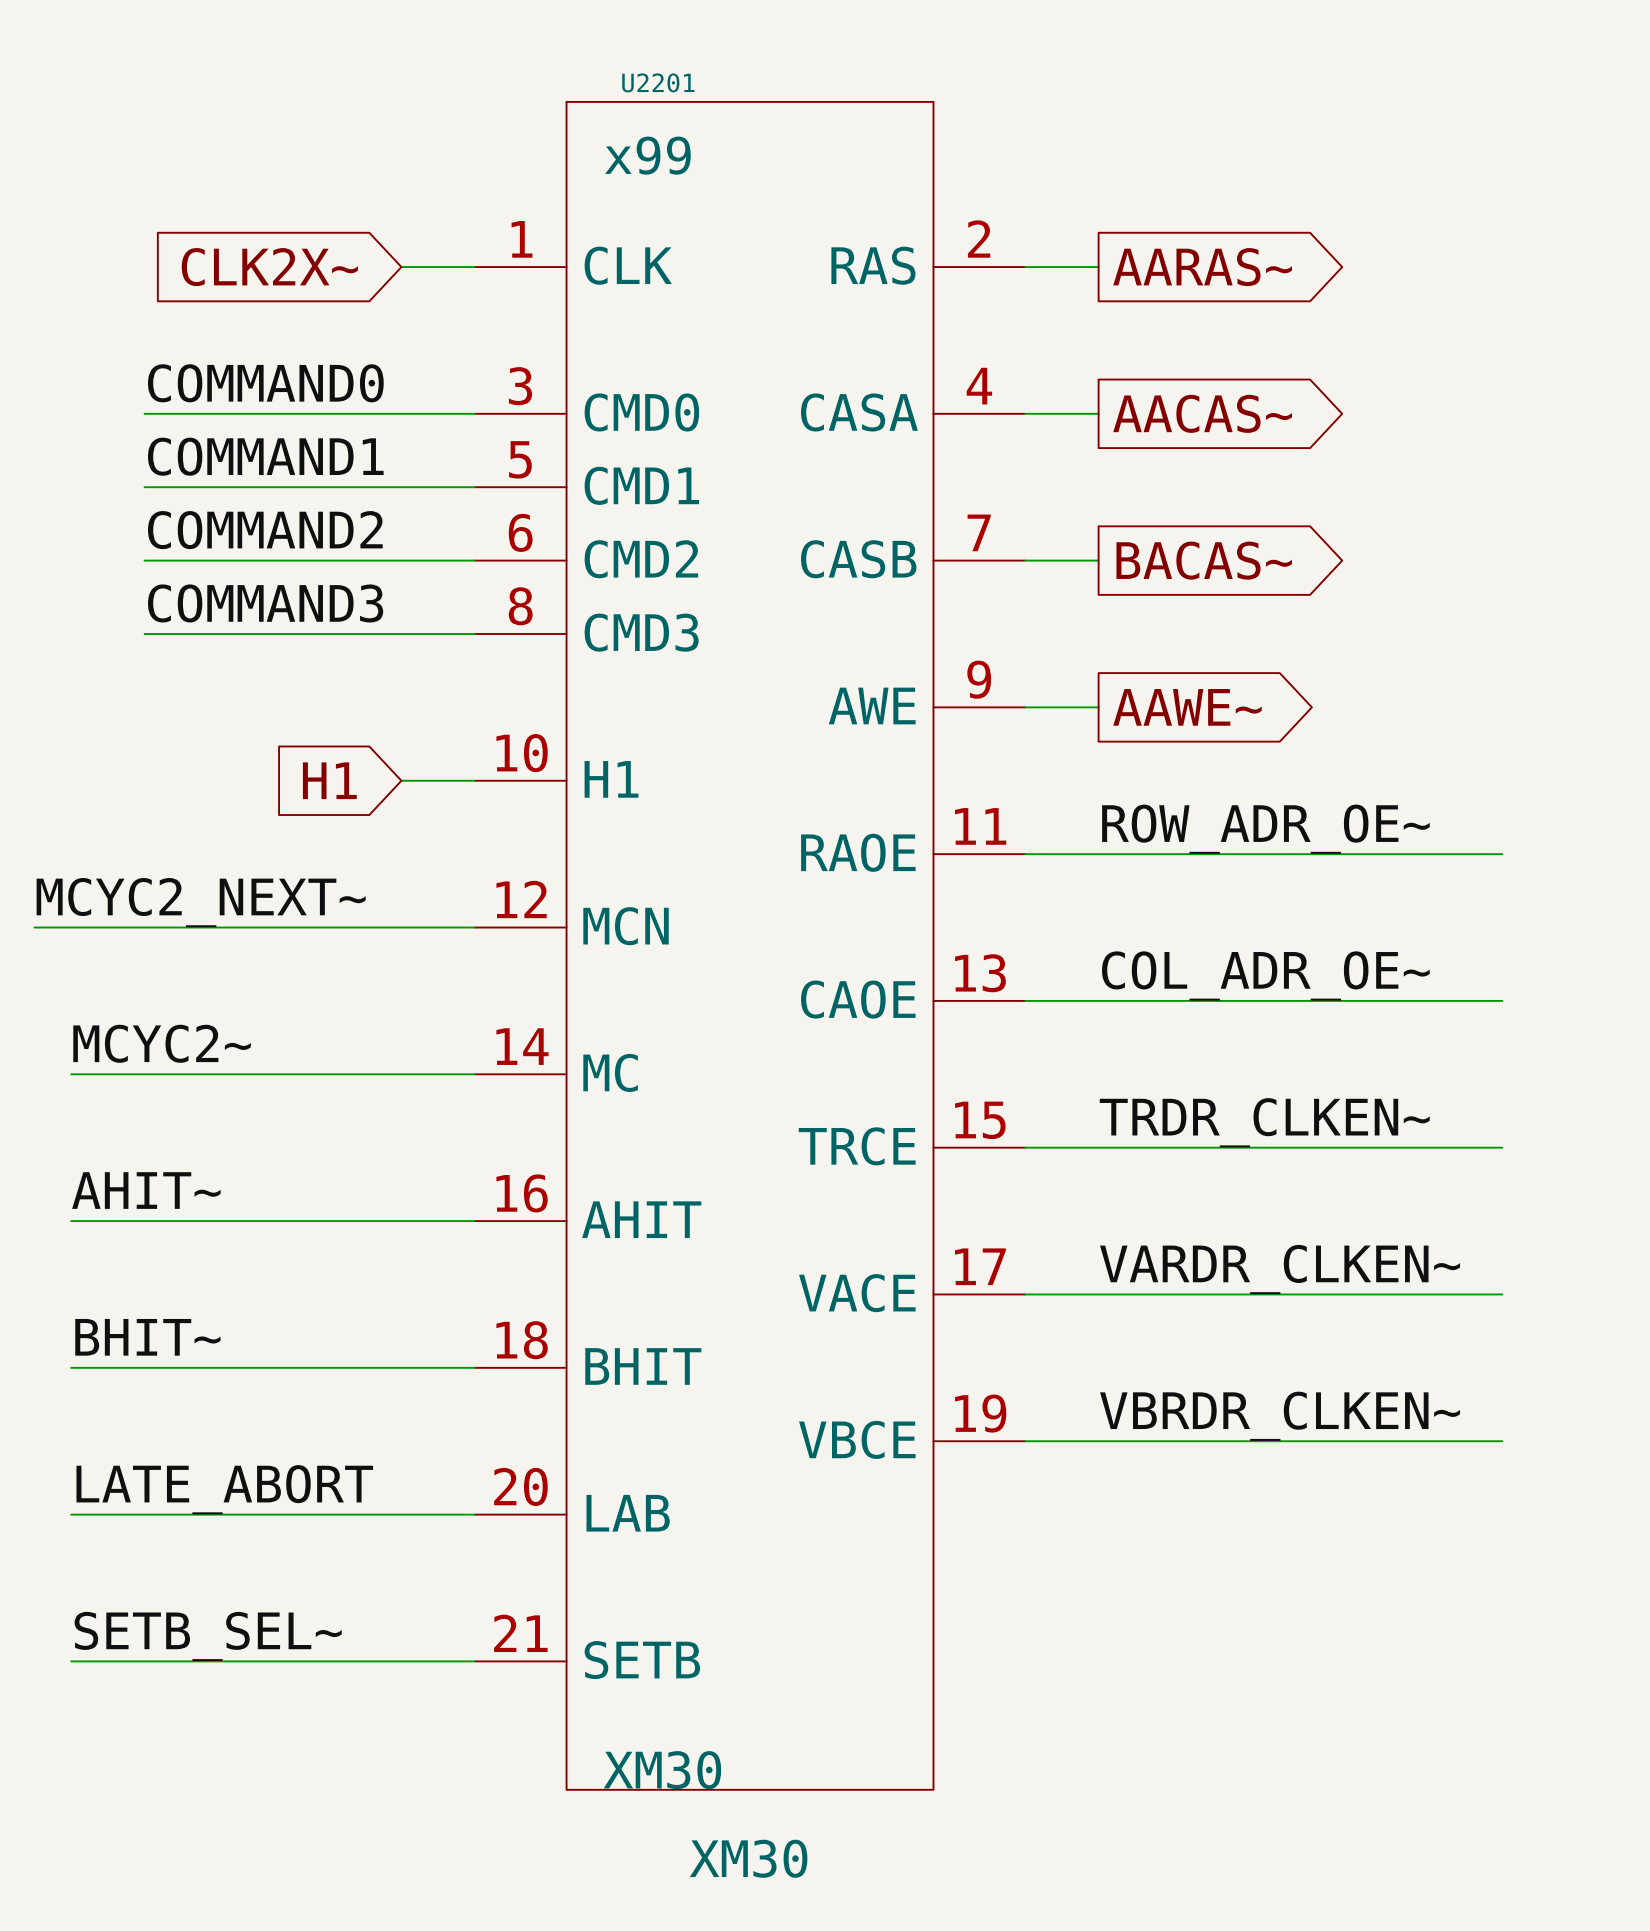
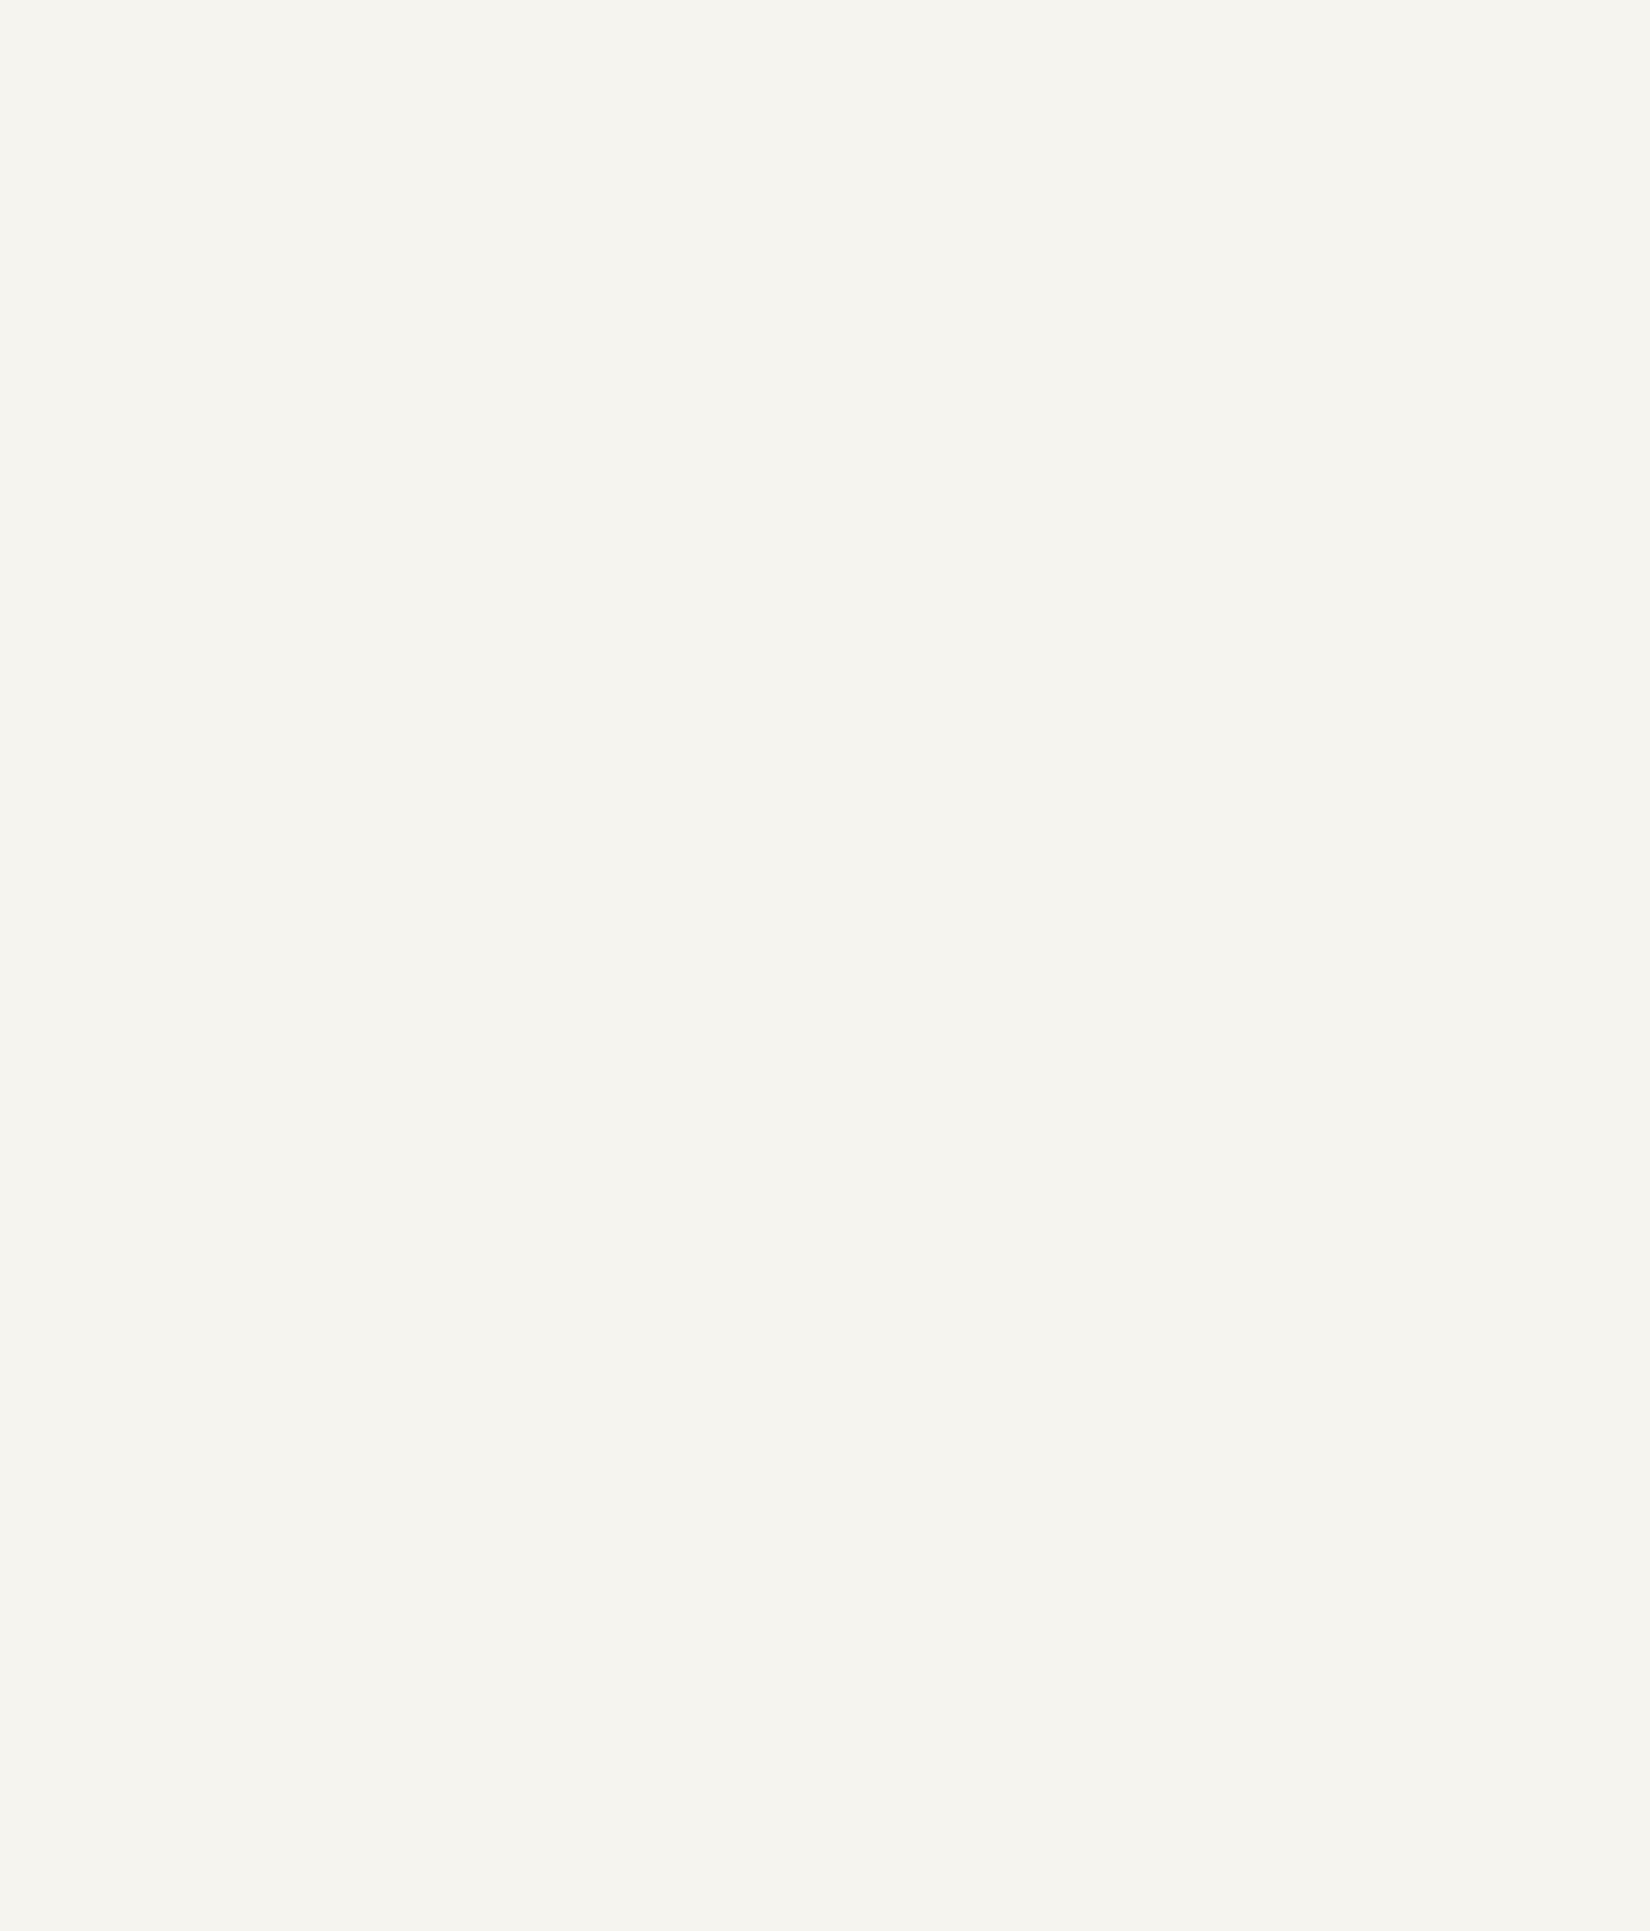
global label: CLK2X~ (269, 267) -> none
wire: (401, 267) (474, 267) -> none
wire: (1025, 267) (1098, 267) -> none
global label: AARAS~ (1202, 267) -> none
label: COMMAND0 (265, 383) -> none
wire: (144, 413) (474, 413) -> none
wire: (1025, 413) (1098, 413) -> none
global label: AACAS~ (1202, 413) -> none
label: COMMAND1 (265, 456) -> none
wire: (144, 487) (474, 487) -> none
label: COMMAND2 (265, 530) -> none
wire: (144, 560) (474, 560) -> none
wire: (1025, 560) (1098, 560) -> none
global label: BACAS~ (1204, 560) -> none
label: COMMAND3 (265, 603) -> none
wire: (144, 633) (474, 633) -> none
wire: (1025, 707) (1098, 707) -> none
global label: AAWE~ (1187, 707) -> none
global label: H1 (329, 780) -> none
wire: (401, 780) (474, 780) -> none
label: ROW_ADR_OE~ (1265, 829) -> none
wire: (1025, 854) (1502, 854) -> none
label: MCYC2_NEXT~ (201, 902) -> none
wire: (34, 927) (474, 927) -> none
U2201: XM30 (750, 945) -> none
label: COL_ADR_OE~ (1265, 975) -> none
wire: (1025, 1000) (1502, 1000) -> none
label: MCYC2~ (162, 1043) -> none
wire: (71, 1074) (474, 1074) -> none
label: TRDR_CLKEN~ (1264, 1122) -> none
wire: (1025, 1147) (1502, 1147) -> none
label: AHIT~ (146, 1190) -> none
wire: (71, 1221) (474, 1221) -> none
label: VARDR_CLKEN~ (1280, 1269) -> none
wire: (1025, 1294) (1502, 1294) -> none
label: BHIT~ (147, 1337) -> none
wire: (71, 1367) (474, 1367) -> none
label: VBRDR_CLKEN~ (1280, 1416) -> none
wire: (1025, 1441) (1502, 1441) -> none
label: LATE_ABORT (224, 1489) -> none
wire: (71, 1514) (474, 1514) -> none
label: SETB_SEL~ (208, 1636) -> none
wire: (71, 1661) (474, 1661) -> none

